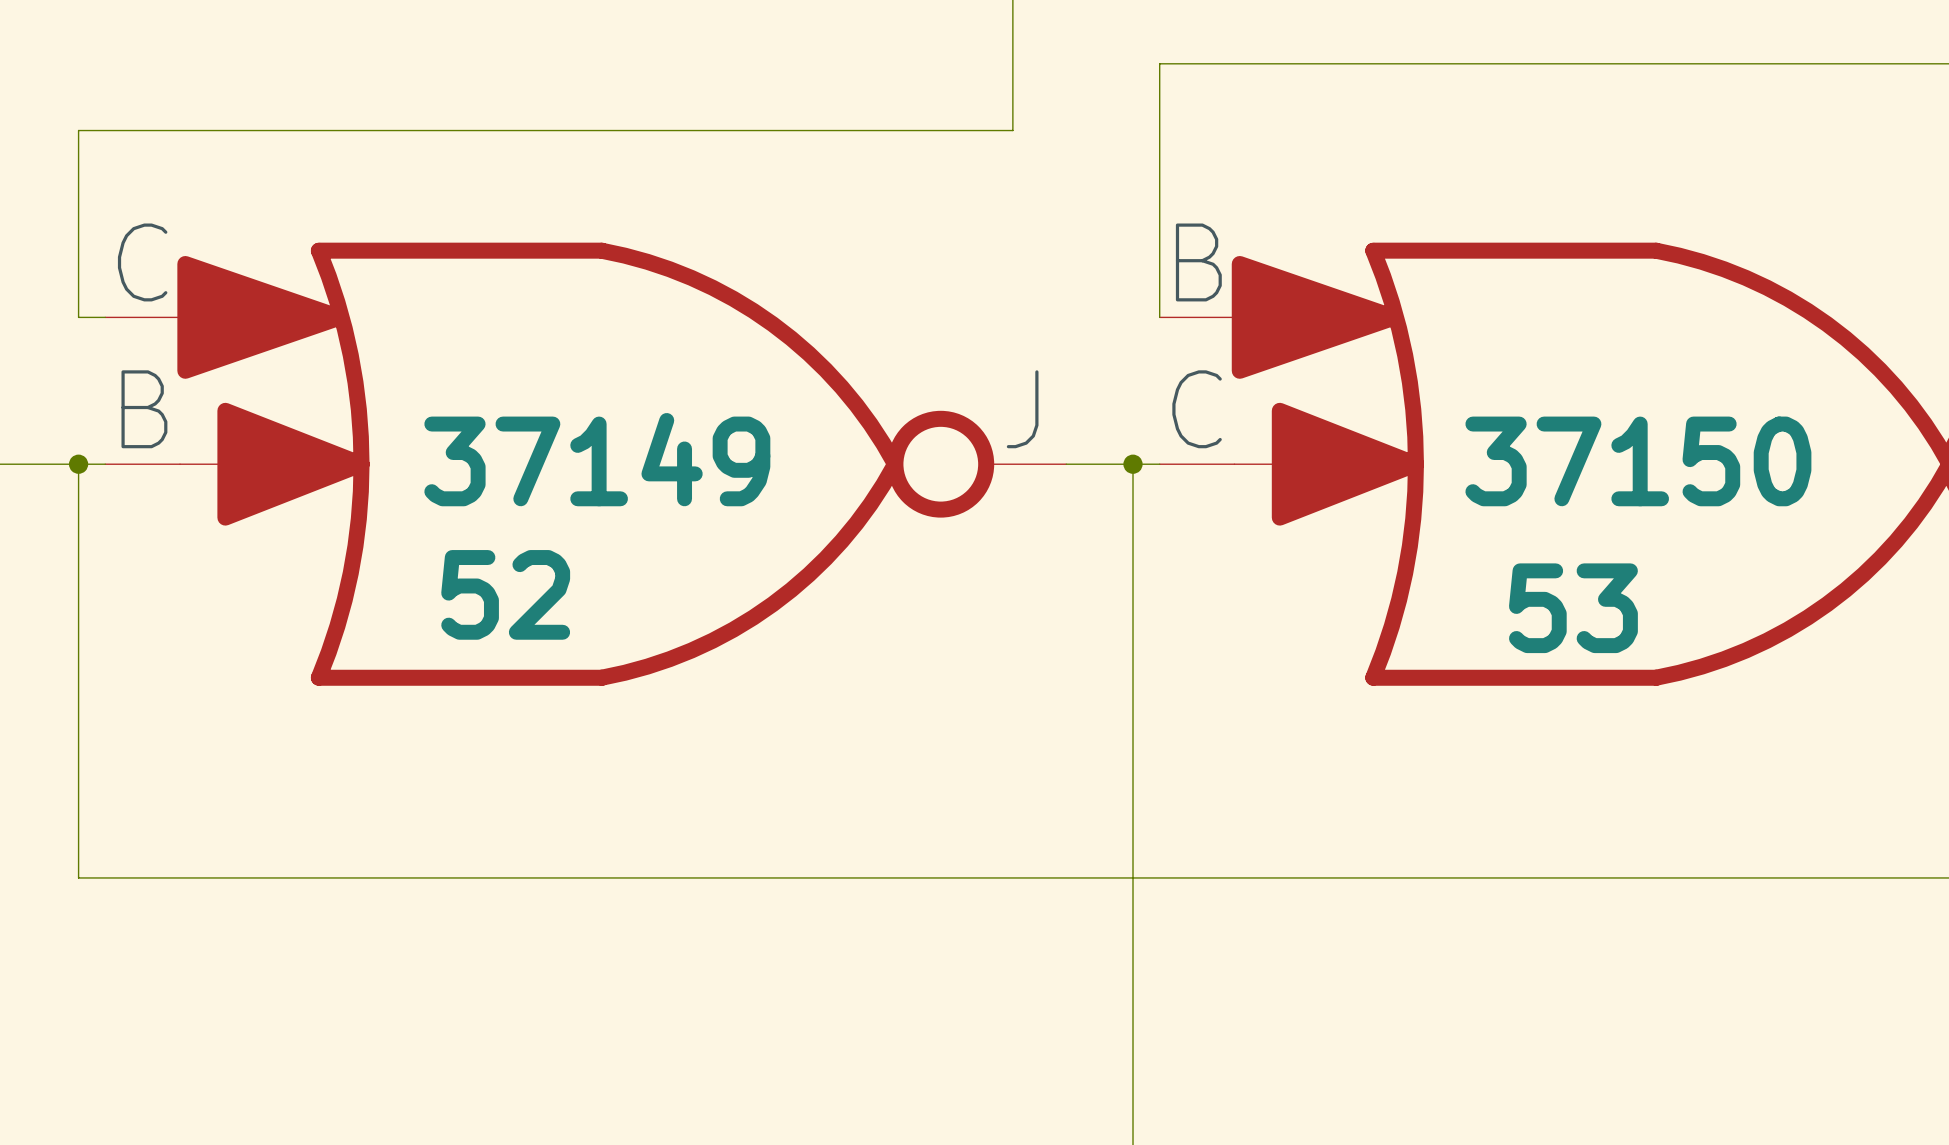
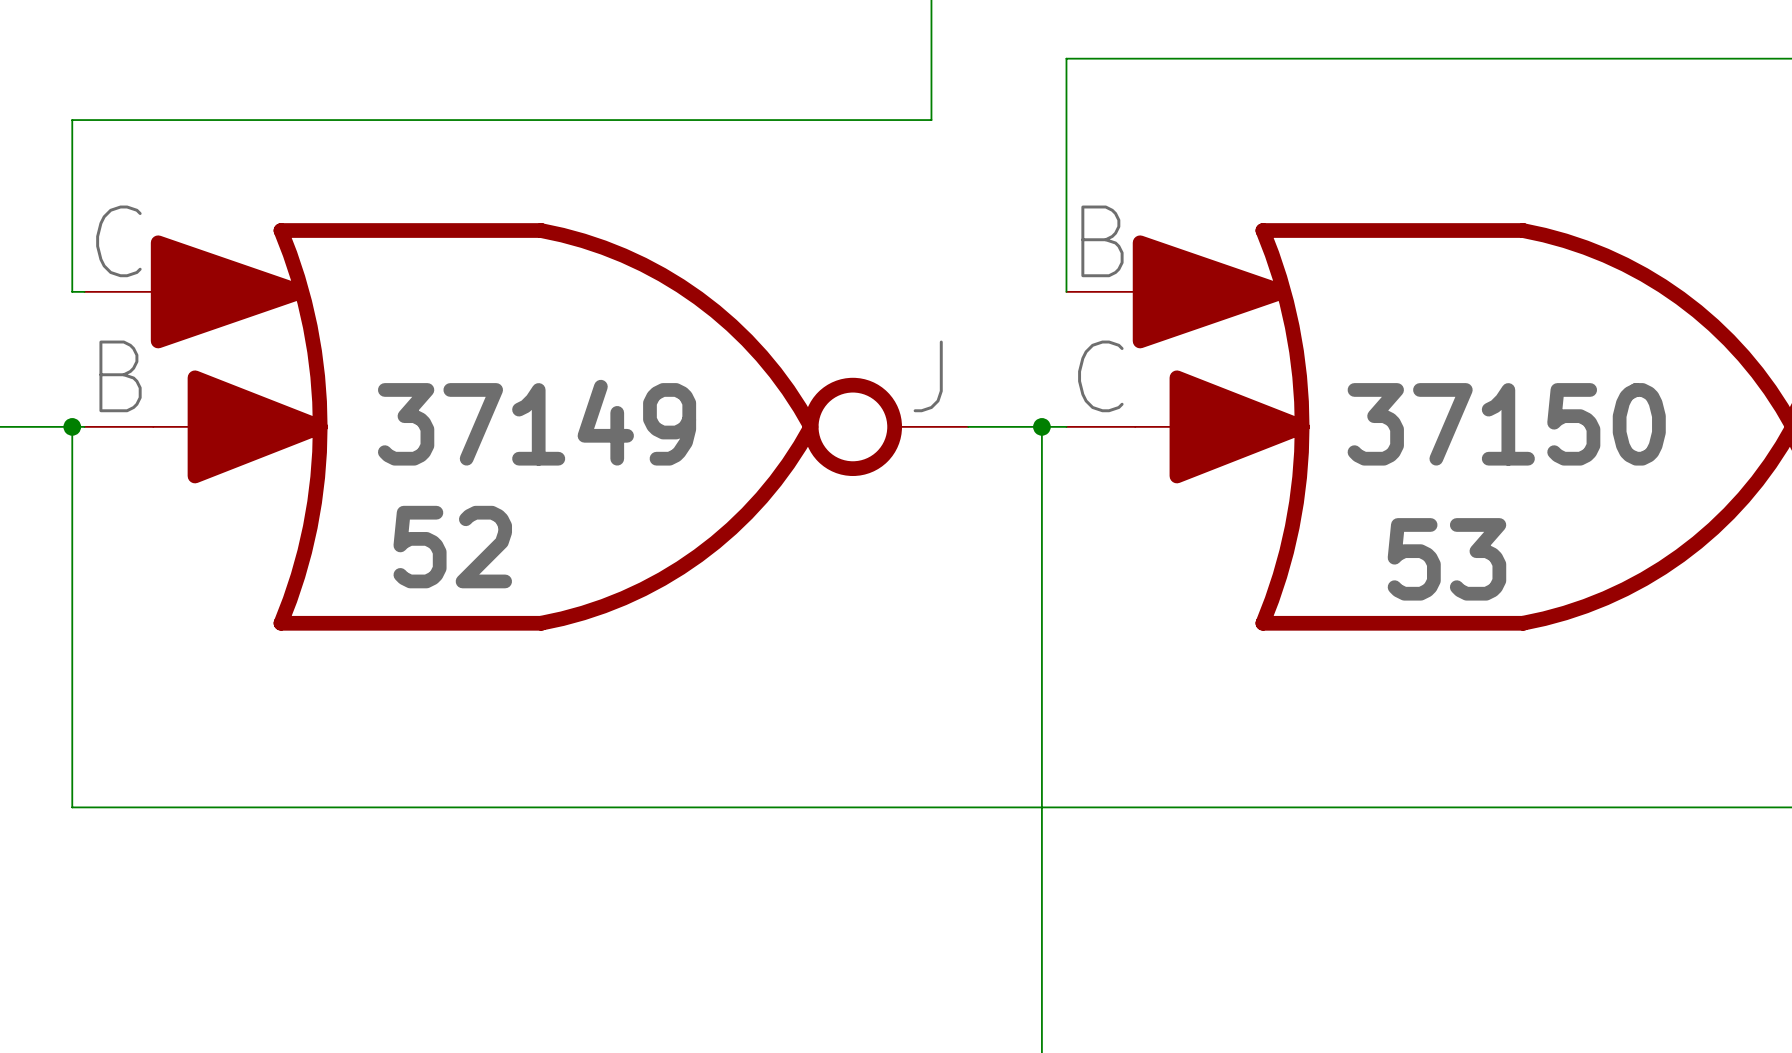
part position: (585, 464) -> (526, 426)

